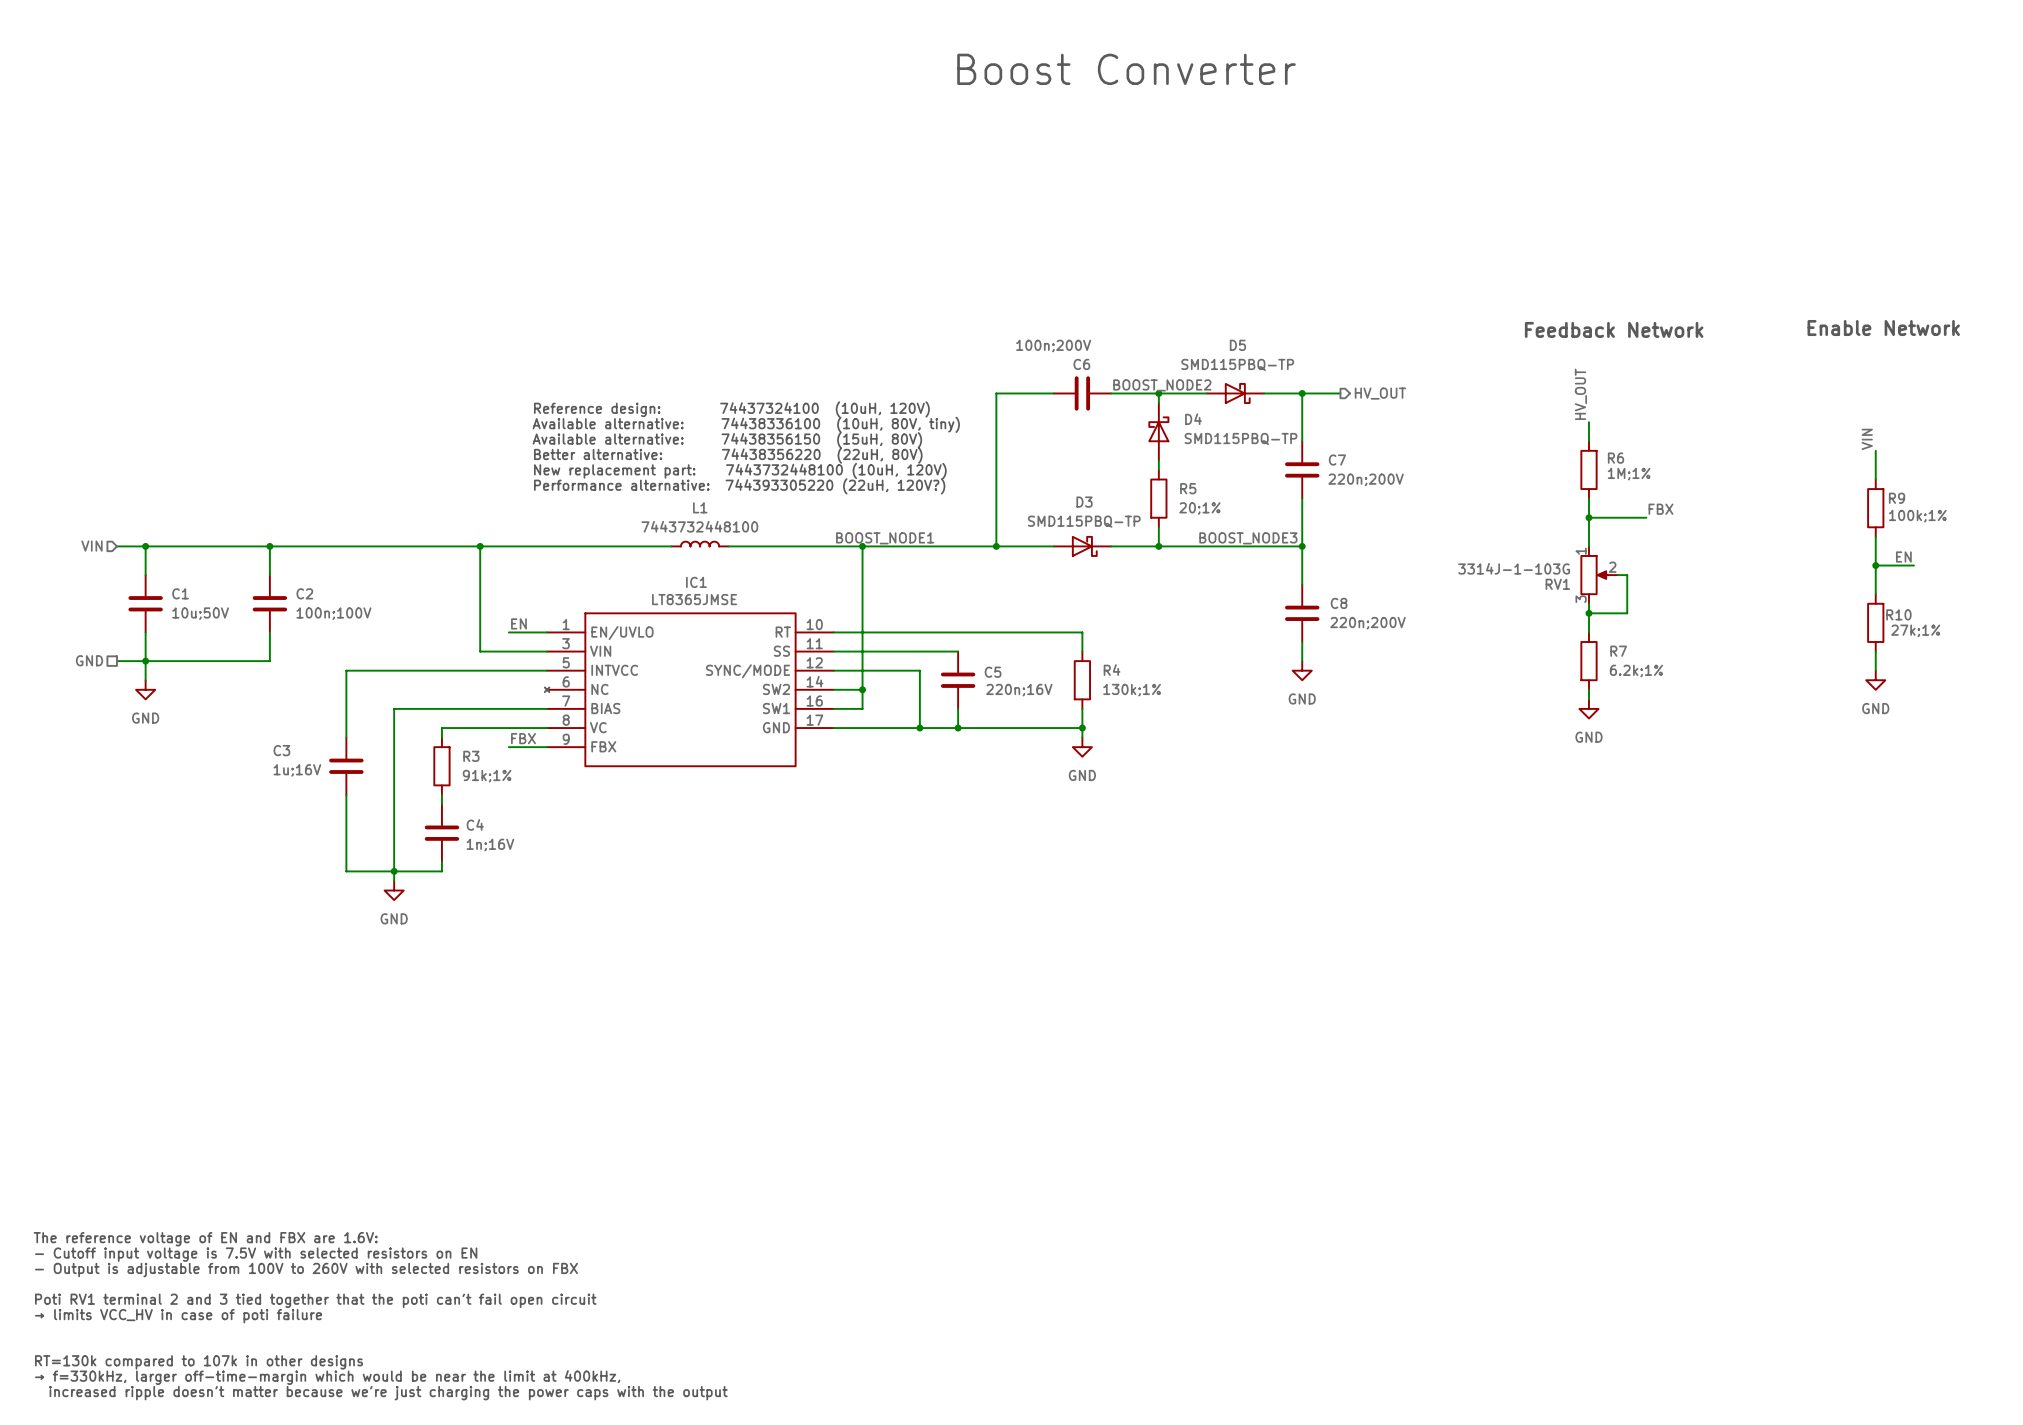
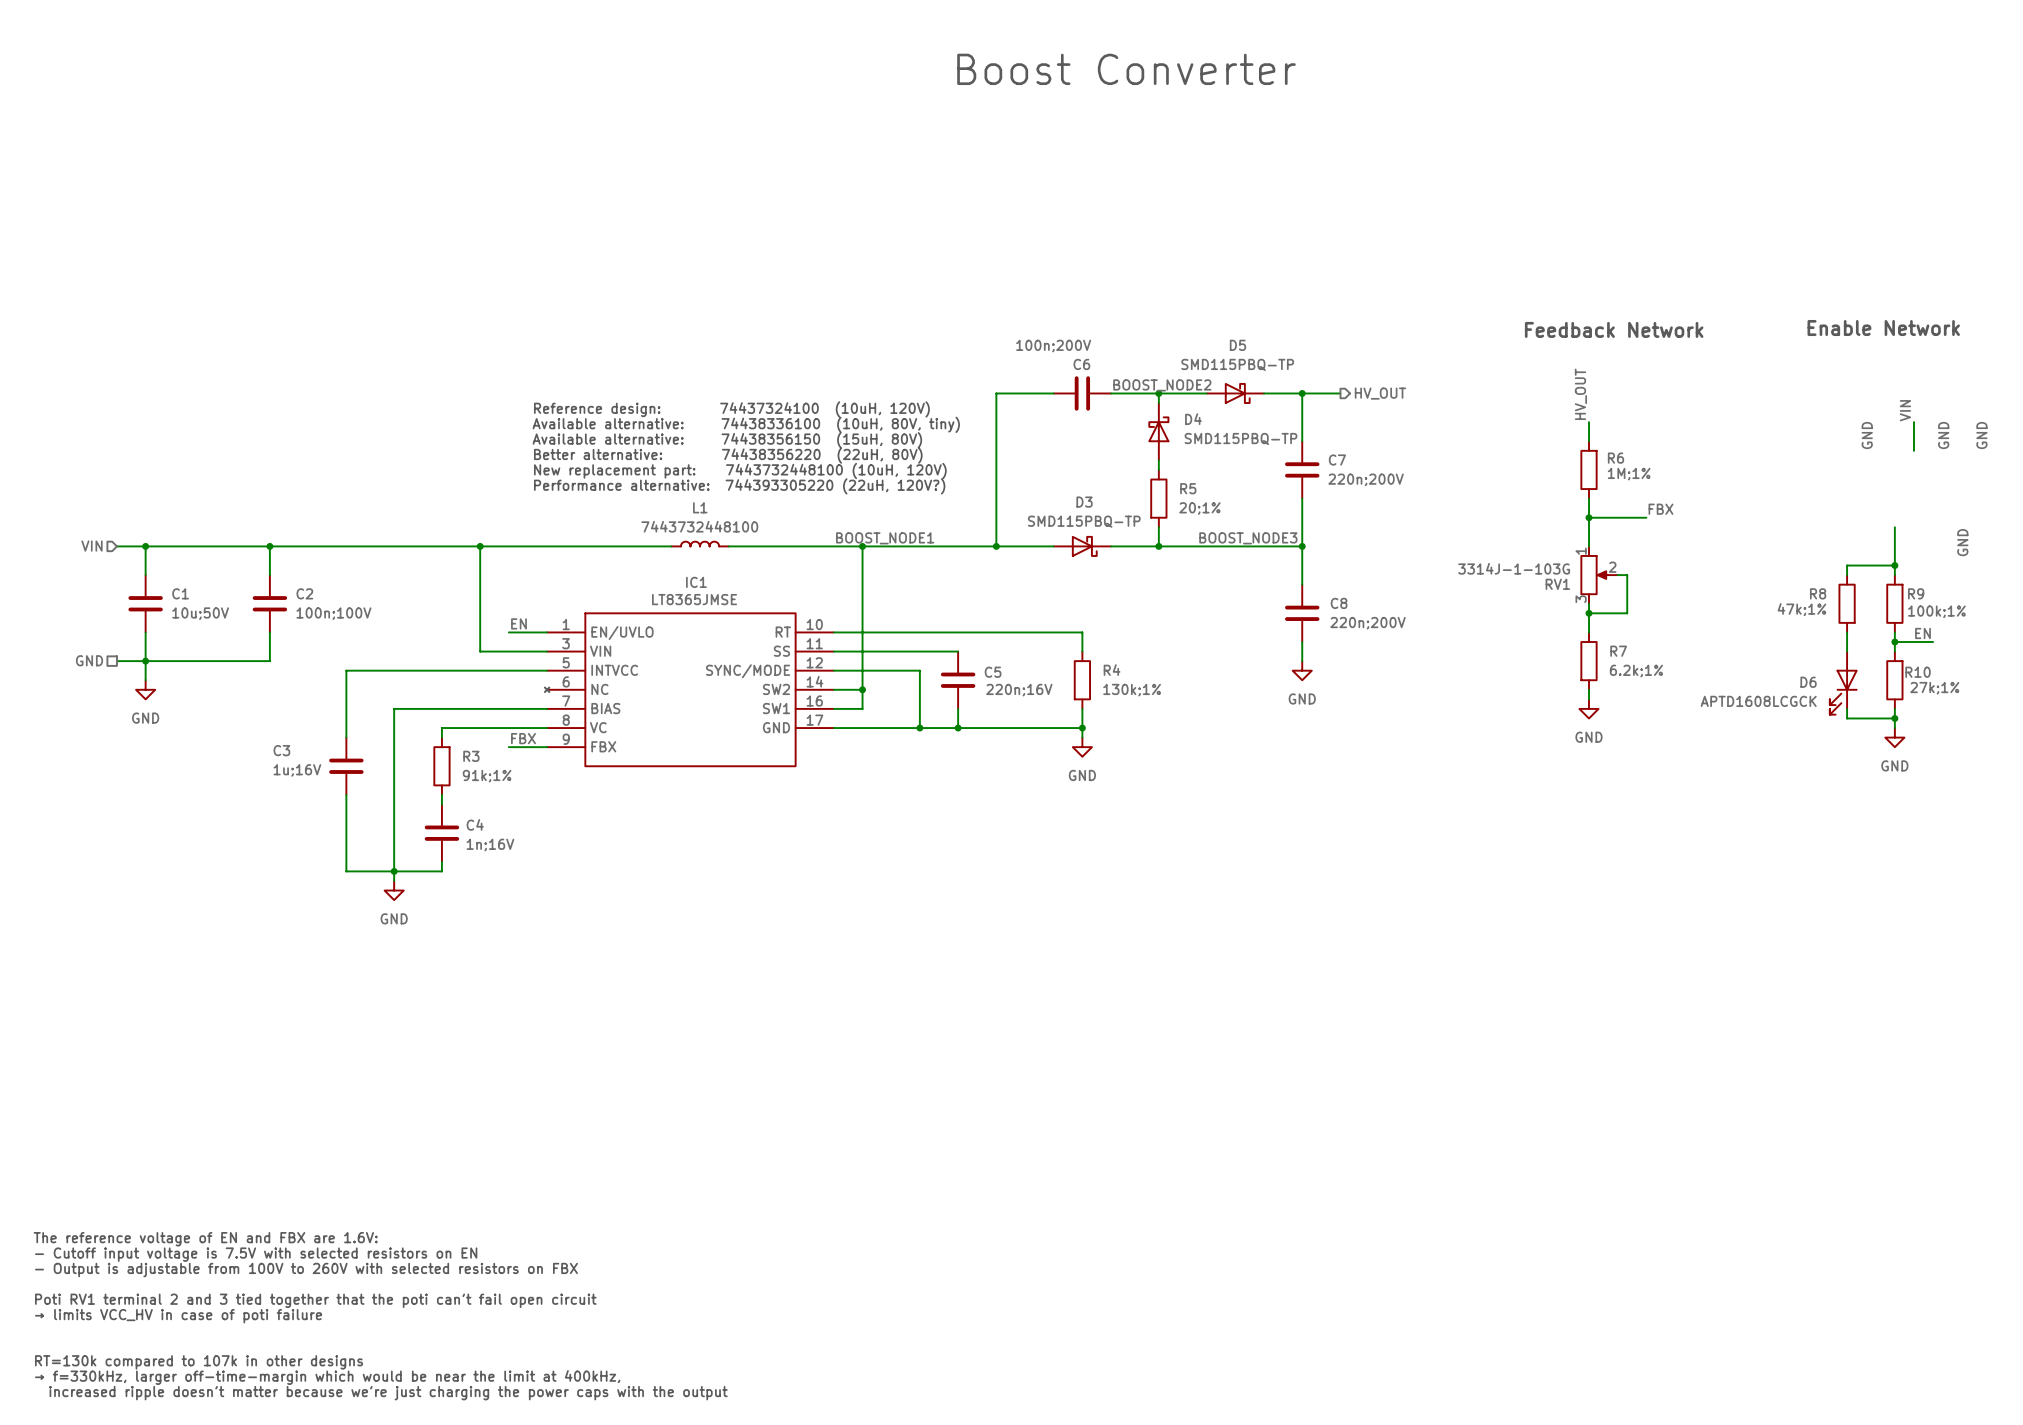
label: none -> VIN (1905, 410)
label: none -> GND (1943, 435)
label: none -> GND (1981, 435)
label: VIN (1867, 439) -> GND (1867, 435)
wire: (1875, 450) (1875, 479) -> (1913, 422) (1913, 450)
R9 position: (1875, 508) -> (1894, 603)
wire: none -> (1894, 527) (1894, 575)
wire: (1875, 536) (1875, 594) -> none
label: none -> GND (1962, 542)
label position: EN (1903, 557) -> EN (1922, 633)
wire: none -> (1875, 565) (1847, 565) (1847, 575)
junction position: (1875, 565) -> (1894, 565)
wire: (1894, 565) (1913, 565) -> none
R8: none -> 47k;1% (1847, 603)
R10 position: (1875, 622) -> (1894, 680)
wire: none -> (1847, 632) (1847, 651)
wire: none -> (1894, 642) (1933, 642)
junction: none -> (1894, 642)
wire: (1875, 651) (1875, 670) -> (1894, 632) (1894, 651)
power symbol position: GND (1875, 680) -> GND (1894, 737)
D6: none -> APTD1608LCGCK (1843, 683)
wire: none -> (1847, 708) (1847, 718) (1894, 718)
wire: none -> (1894, 708) (1894, 728)
junction: none -> (1894, 718)

